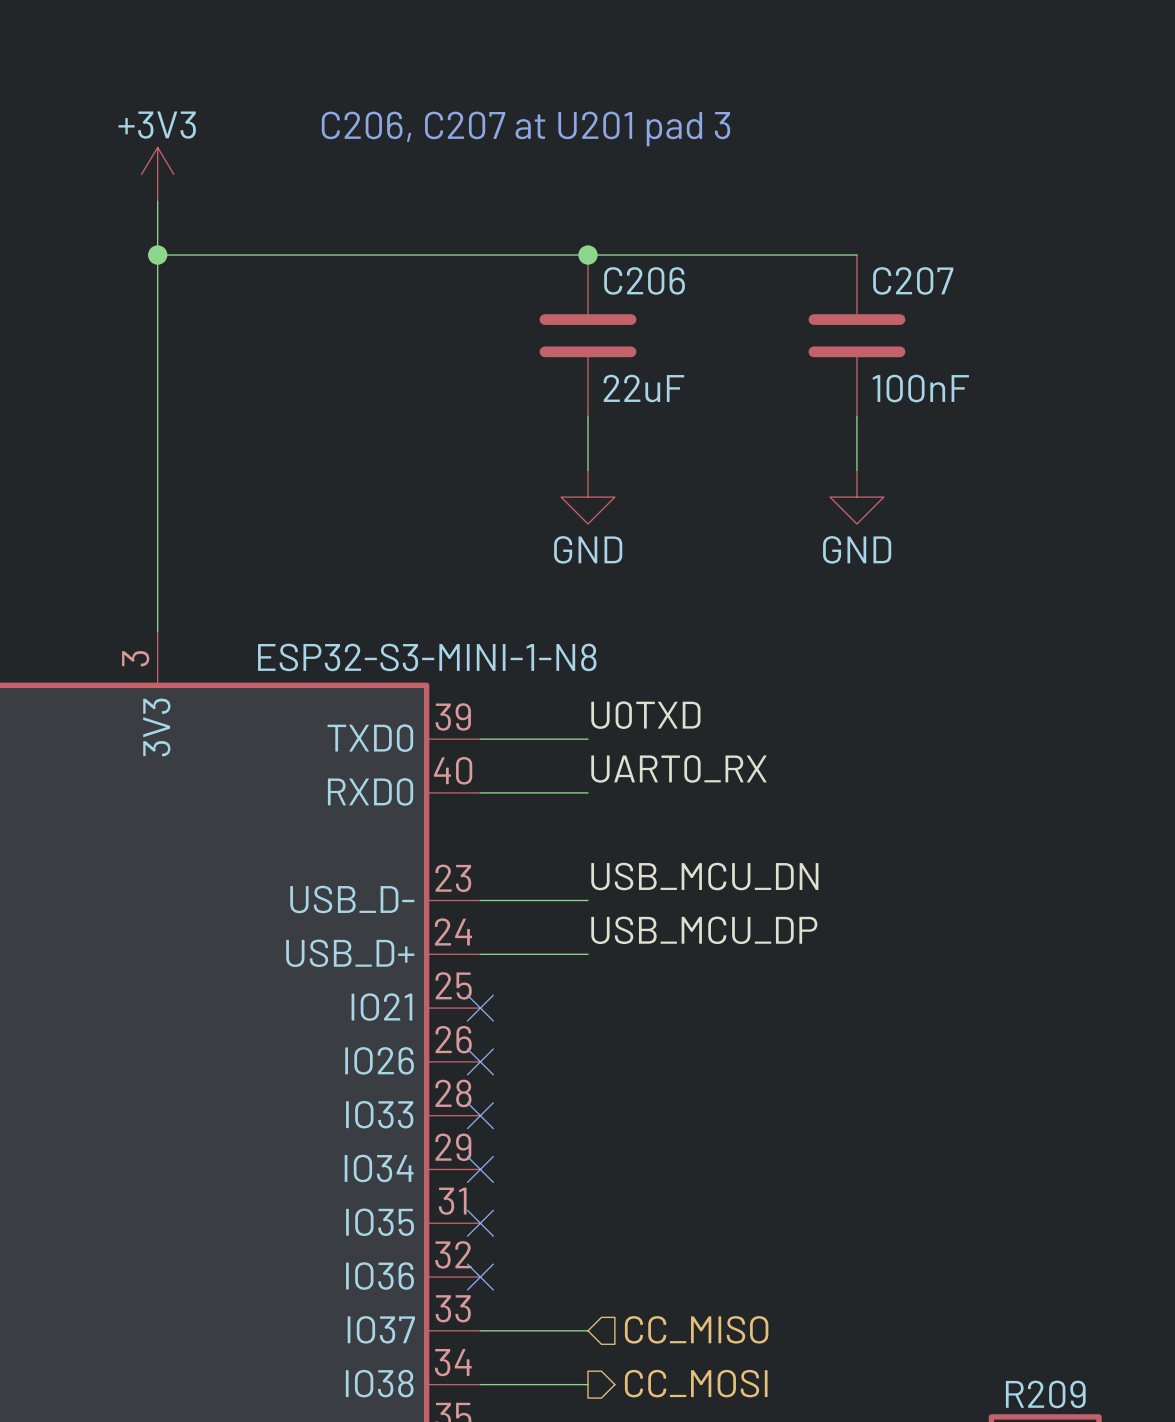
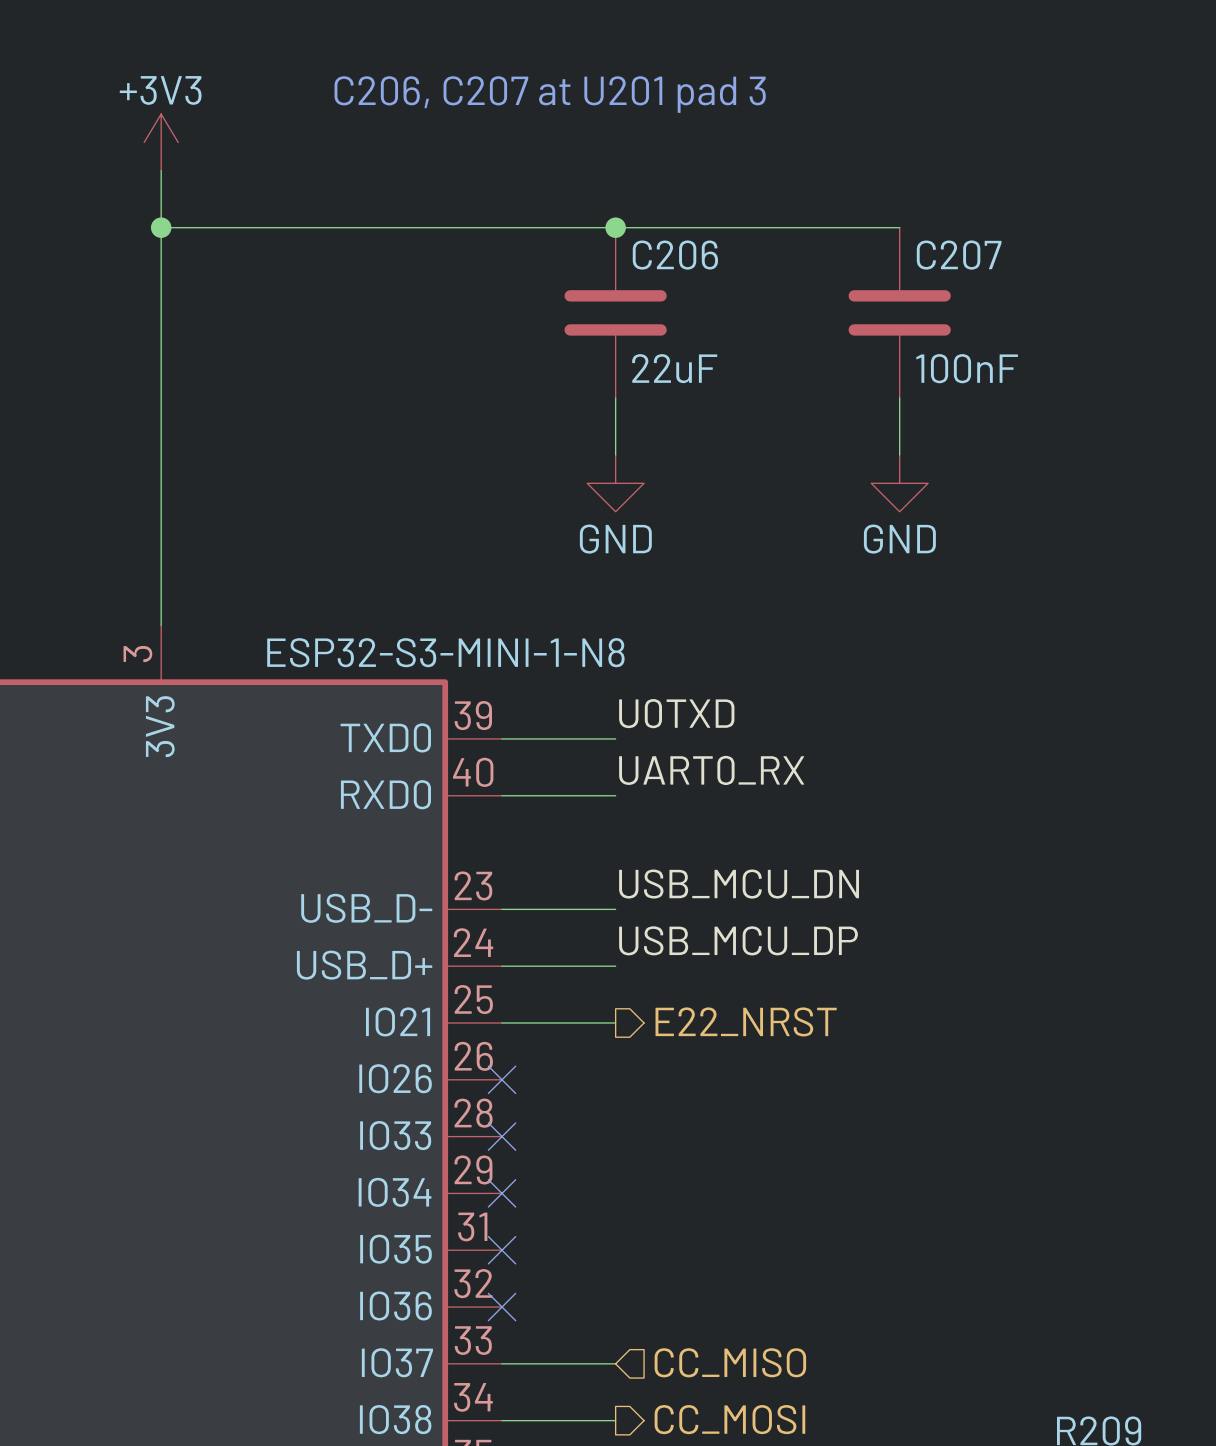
hierarchical label: none -> E22_NRST (746, 1021)
wire: none -> (502, 1022) (615, 1022)
no-connect mark: (480, 1008) -> none

